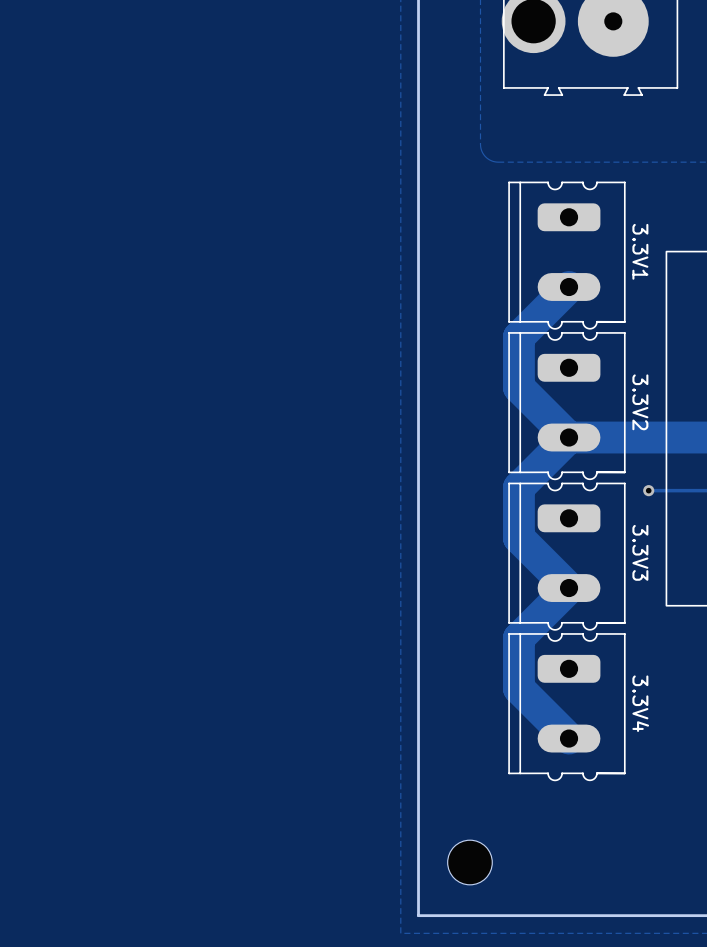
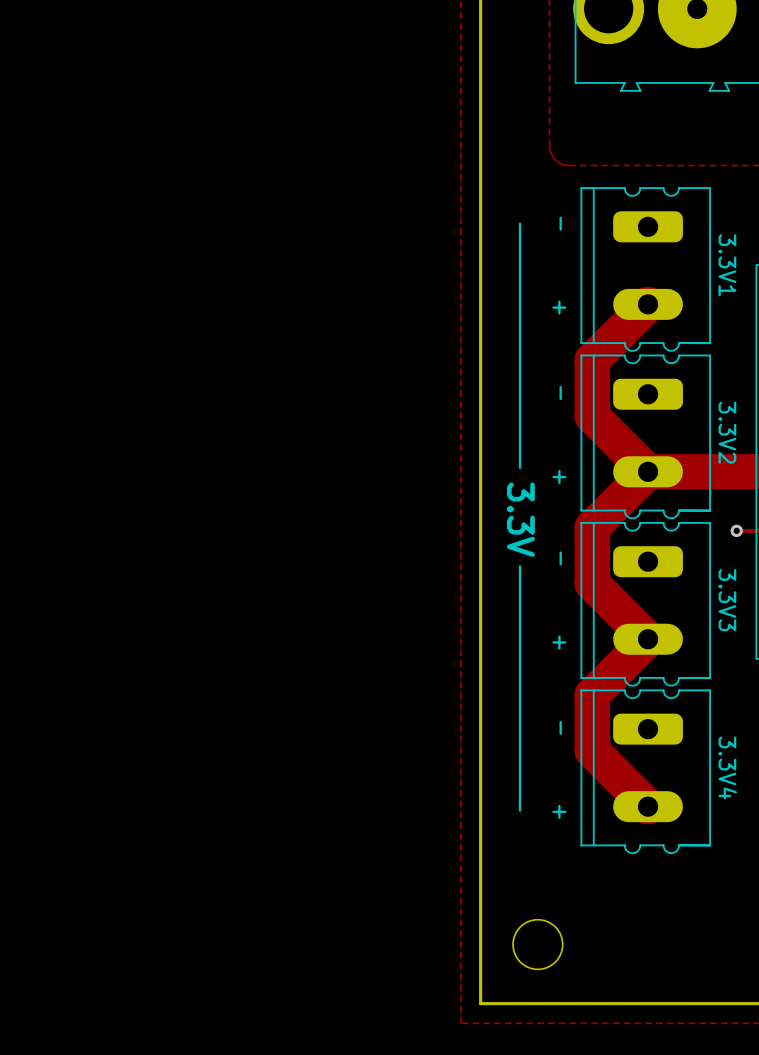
line: none -> (520, 223) (520, 467)
text: none -> - (560, 223)
text: none -> + (559, 307)
text: none -> - (560, 393)
text: none -> + (559, 477)
text: none -> 3.3V (520, 519)
text: none -> - (560, 558)
line: none -> (520, 566) (520, 810)
text: none -> + (559, 642)
text: none -> - (560, 727)
text: none -> + (559, 811)

